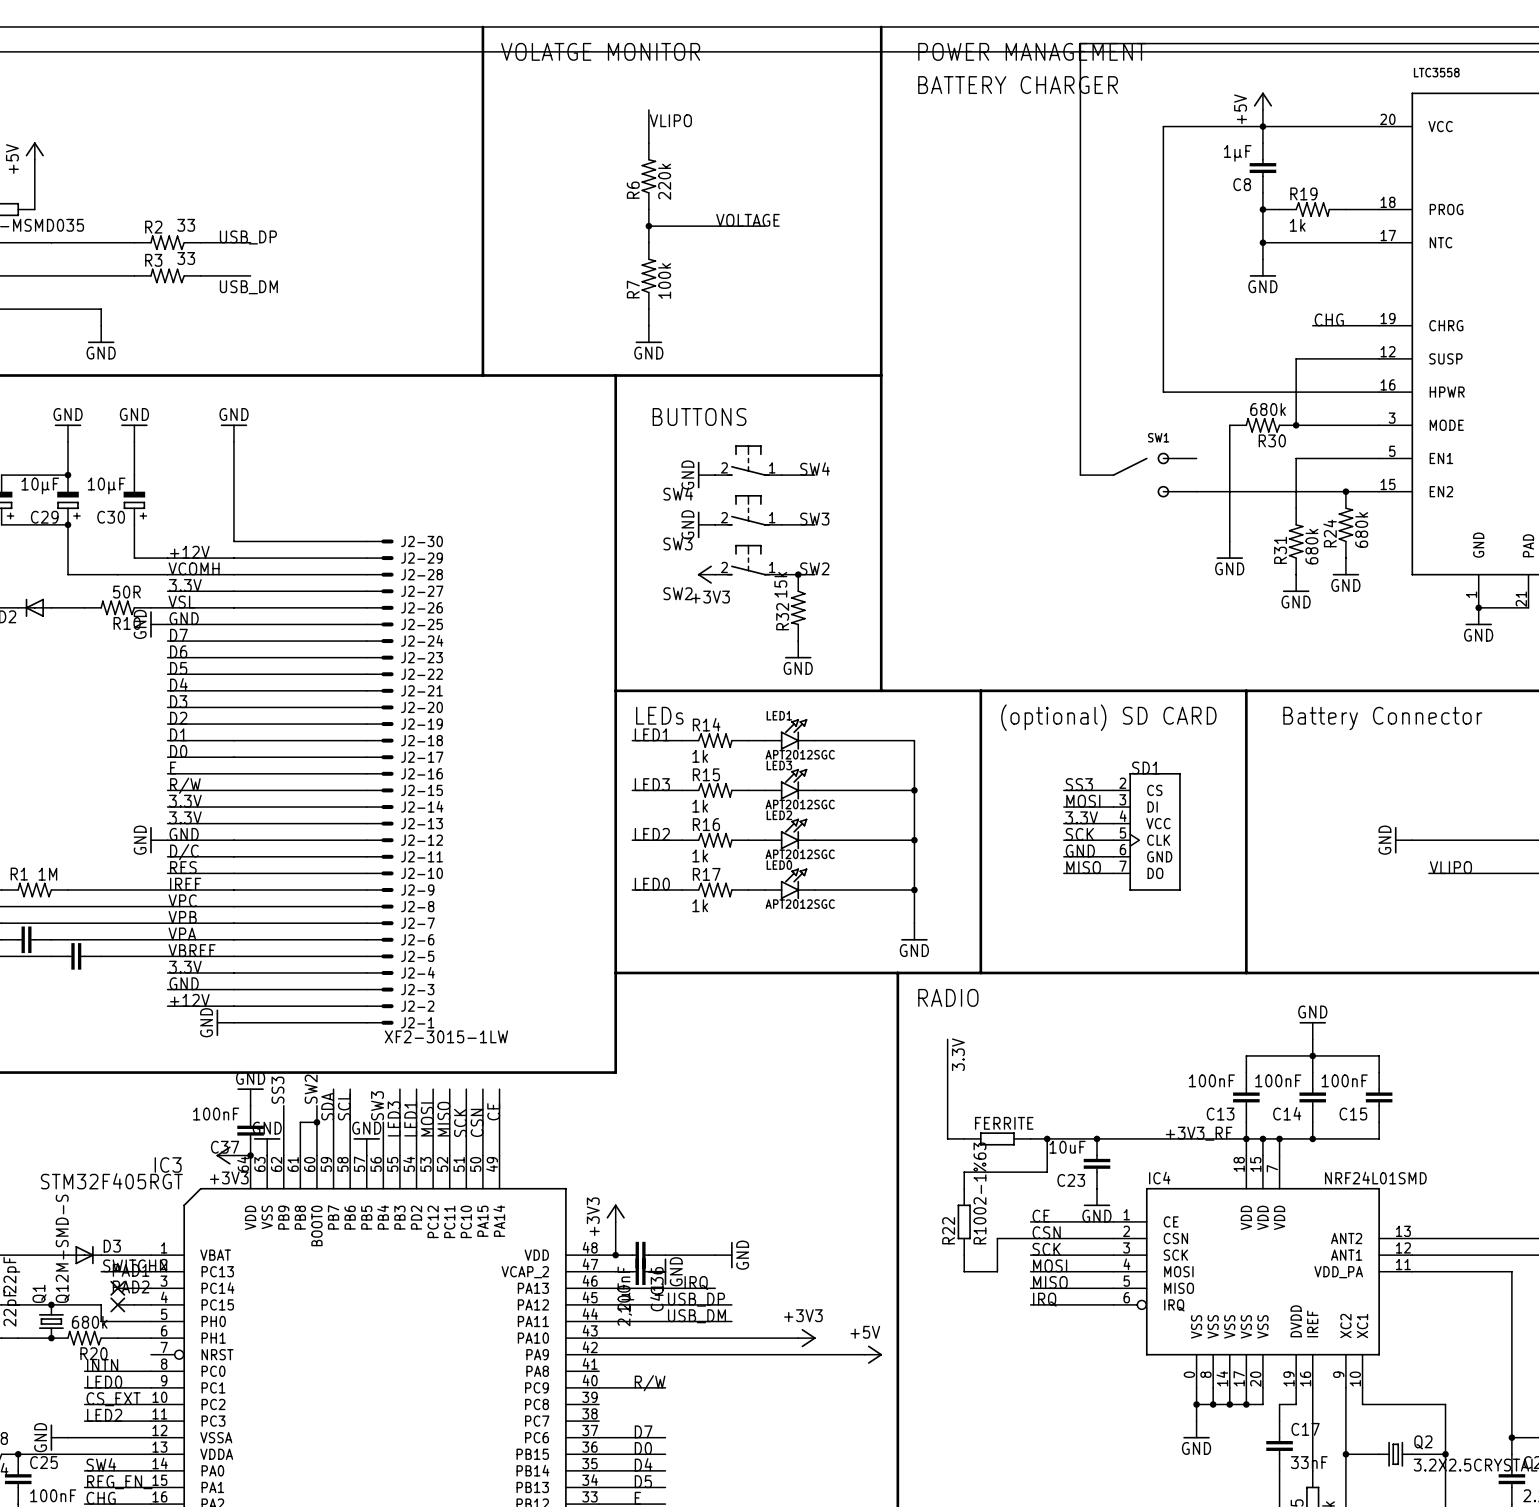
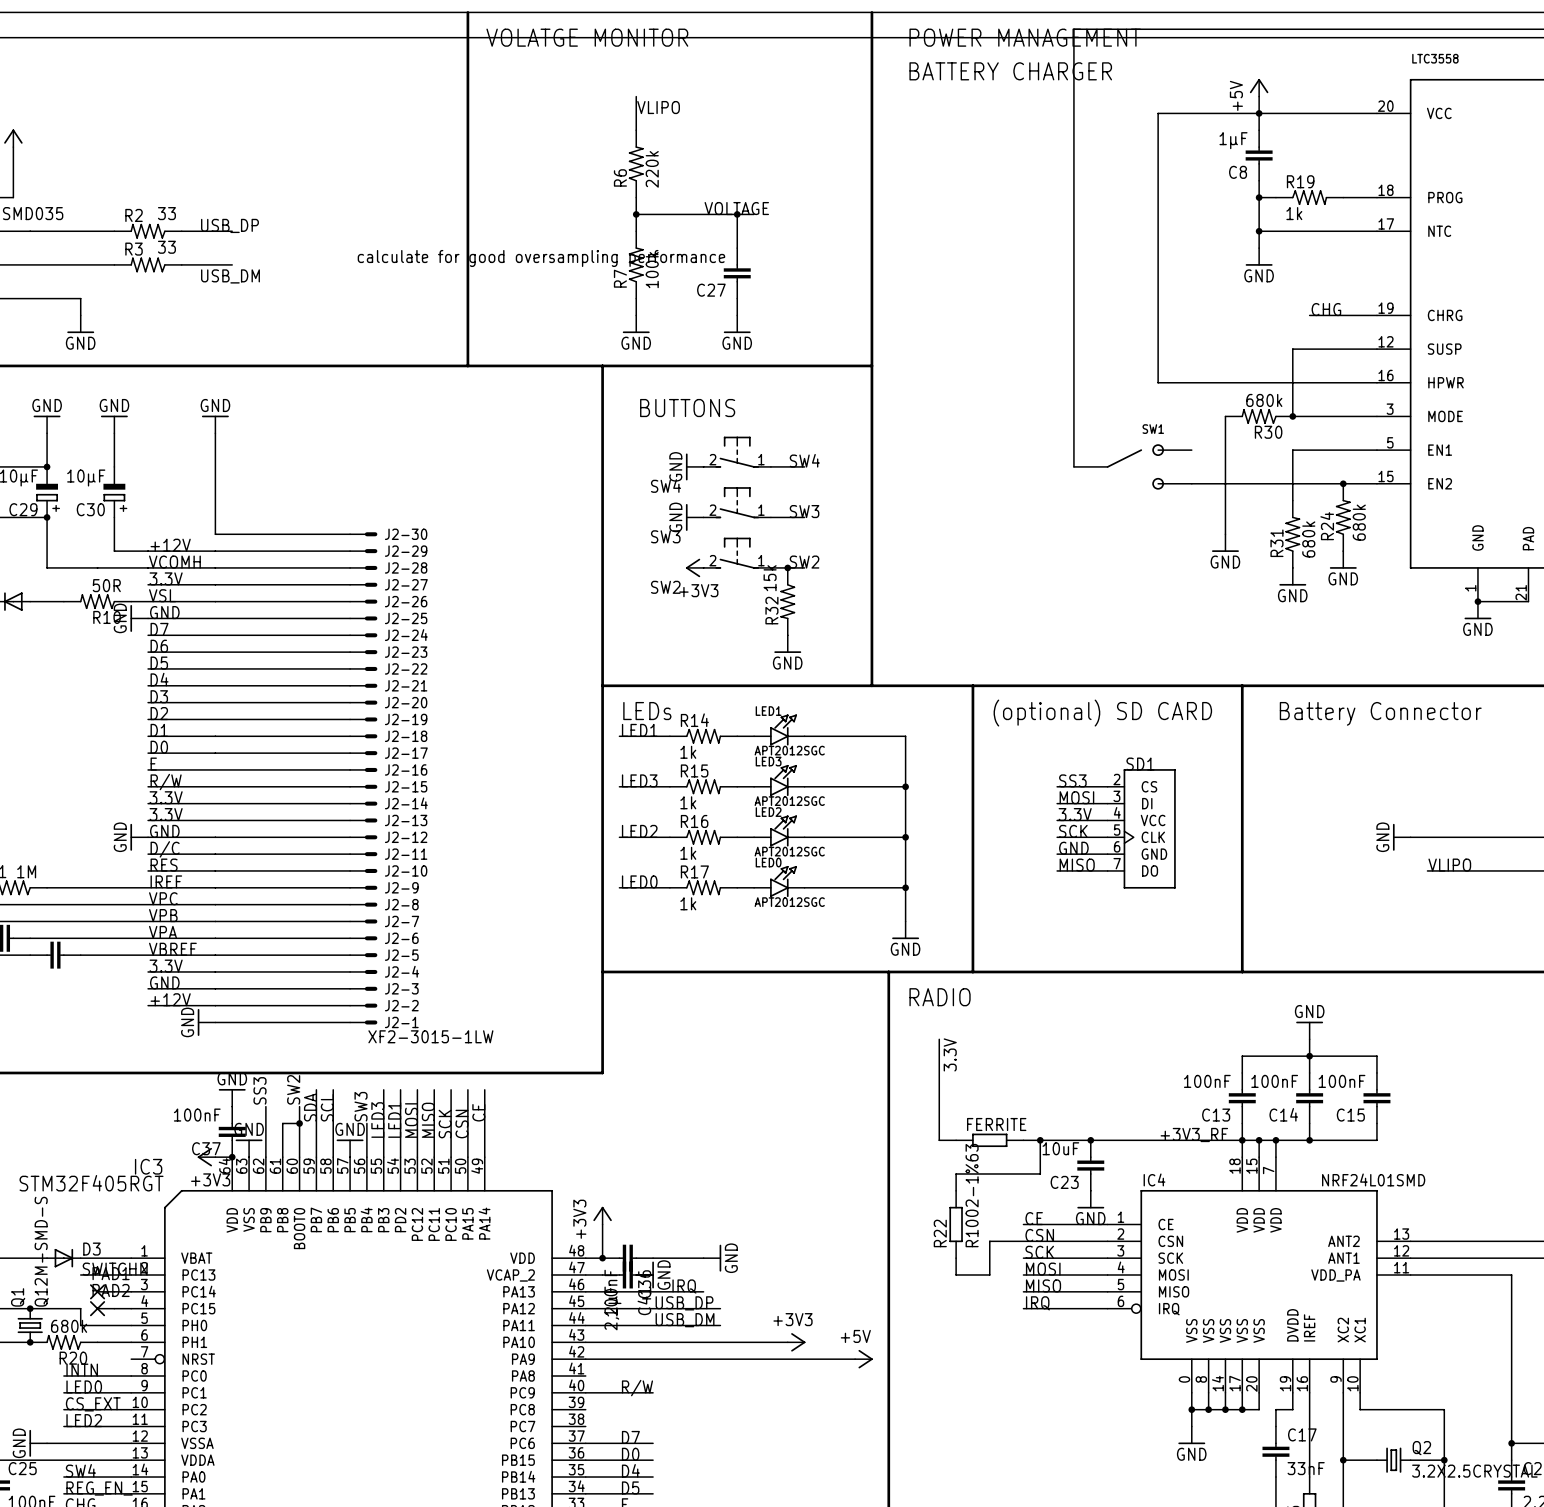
wire: none -> (737, 214) (737, 248)
junction: none -> (737, 214)
C27: none -> calculate for good oversampling performance (737, 273)
wire: none -> (737, 298) (737, 315)
power symbol: none -> GND (737, 324)

